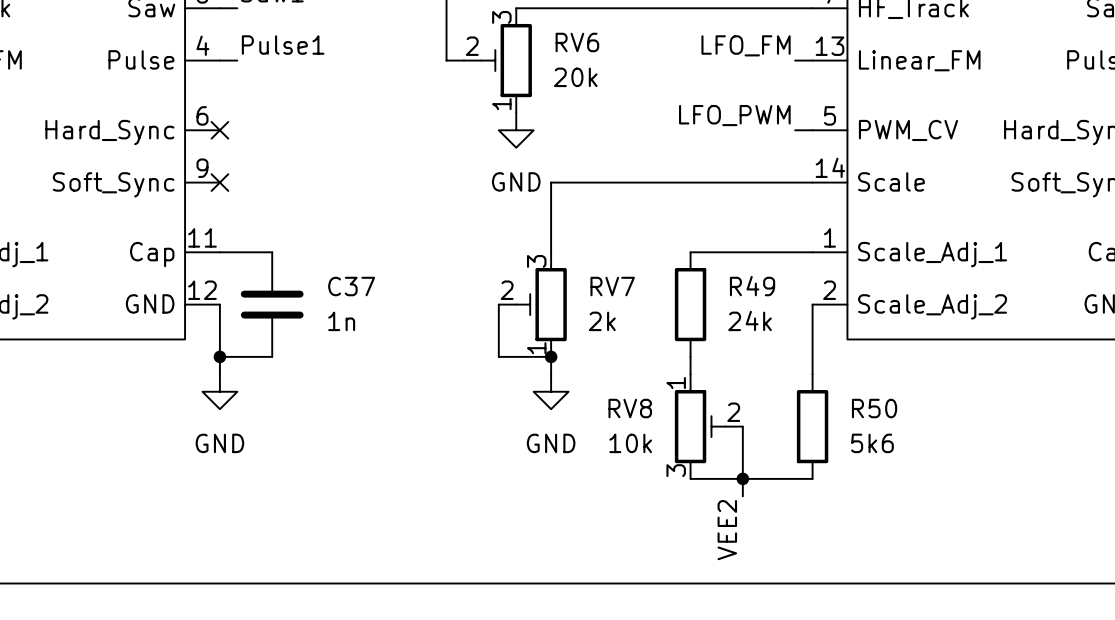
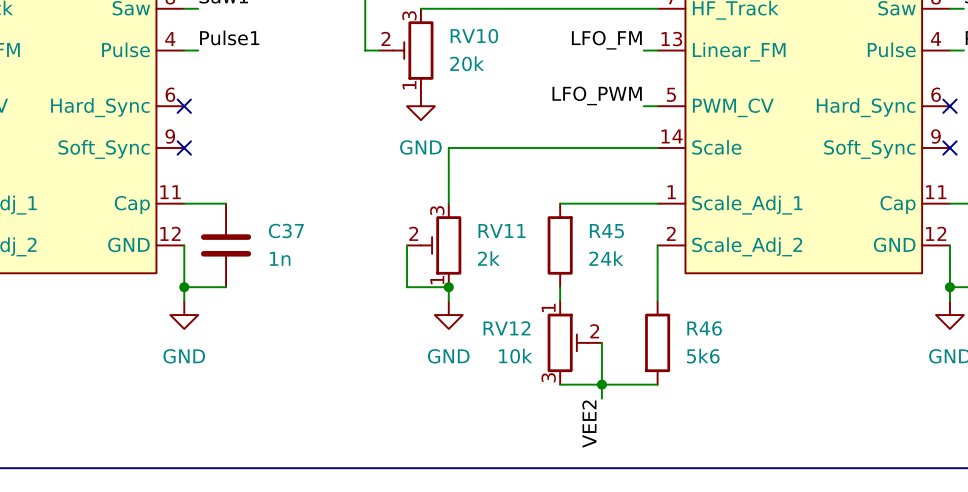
RV6 name: RV6 (577, 42) -> RV10 (474, 36)
RV7 name: RV7 (612, 286) -> RV11 (502, 230)
R49 name: R49 (752, 286) -> R45 (606, 231)
RV8 name: RV8 (630, 408) -> RV12 (506, 328)
R50 name: R50 (874, 408) -> R46 (704, 328)

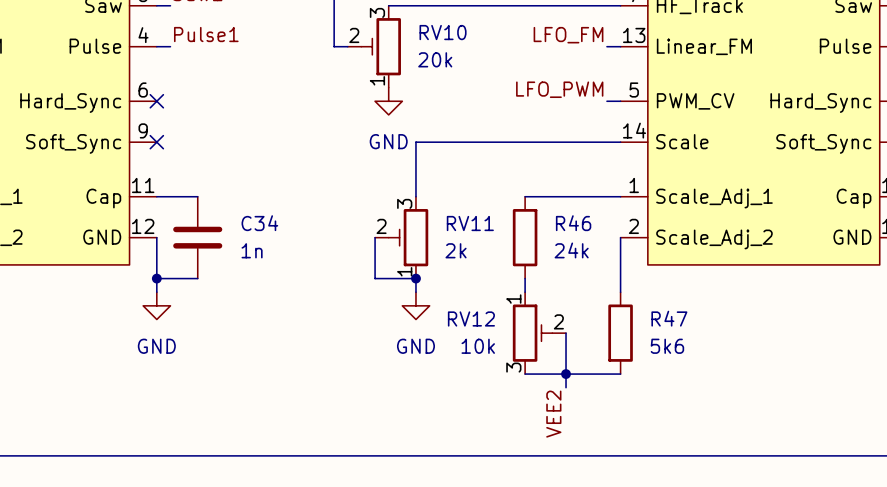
C37 name: C37 (286, 231) -> C34 (259, 223)
R45 name: R45 (606, 231) -> R46 (573, 223)
R46 name: R46 (704, 328) -> R47 (669, 318)

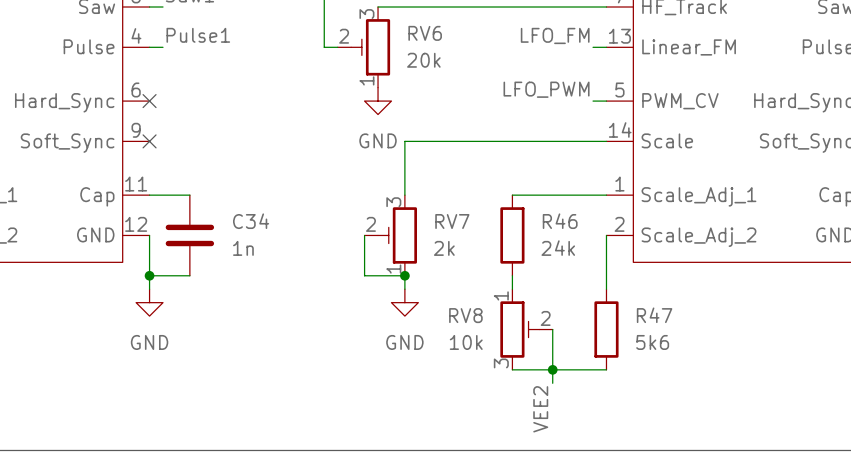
RV10 name: RV10 (443, 32) -> RV6 (425, 33)
RV11 name: RV11 (470, 223) -> RV7 (452, 221)
RV12 name: RV12 (471, 318) -> RV8 (465, 315)

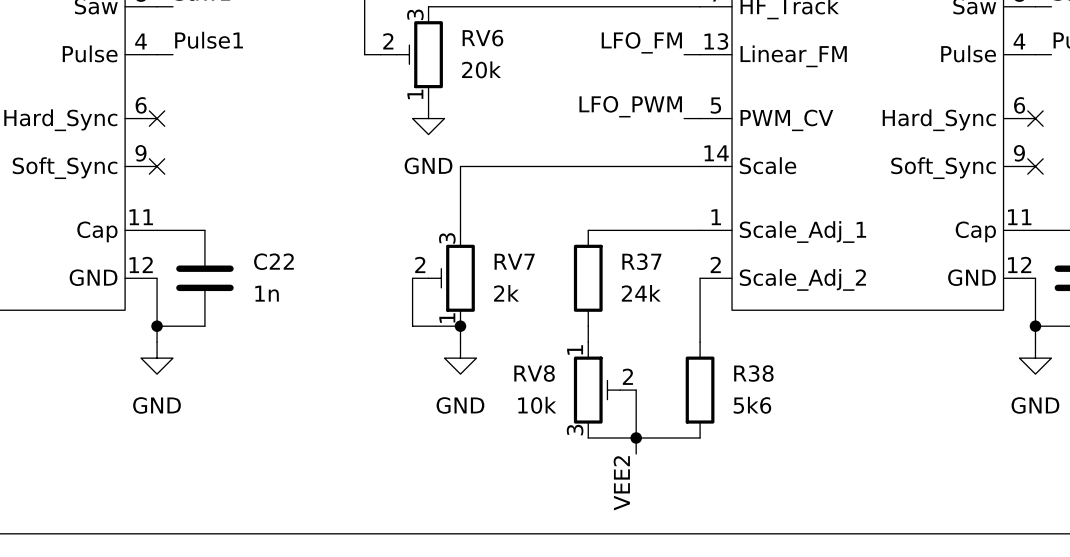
C34 name: C34 (251, 221) -> C22 (273, 261)
R46 name: R46 (560, 221) -> R37 (641, 261)
R47 name: R47 (654, 315) -> R38 (753, 373)

